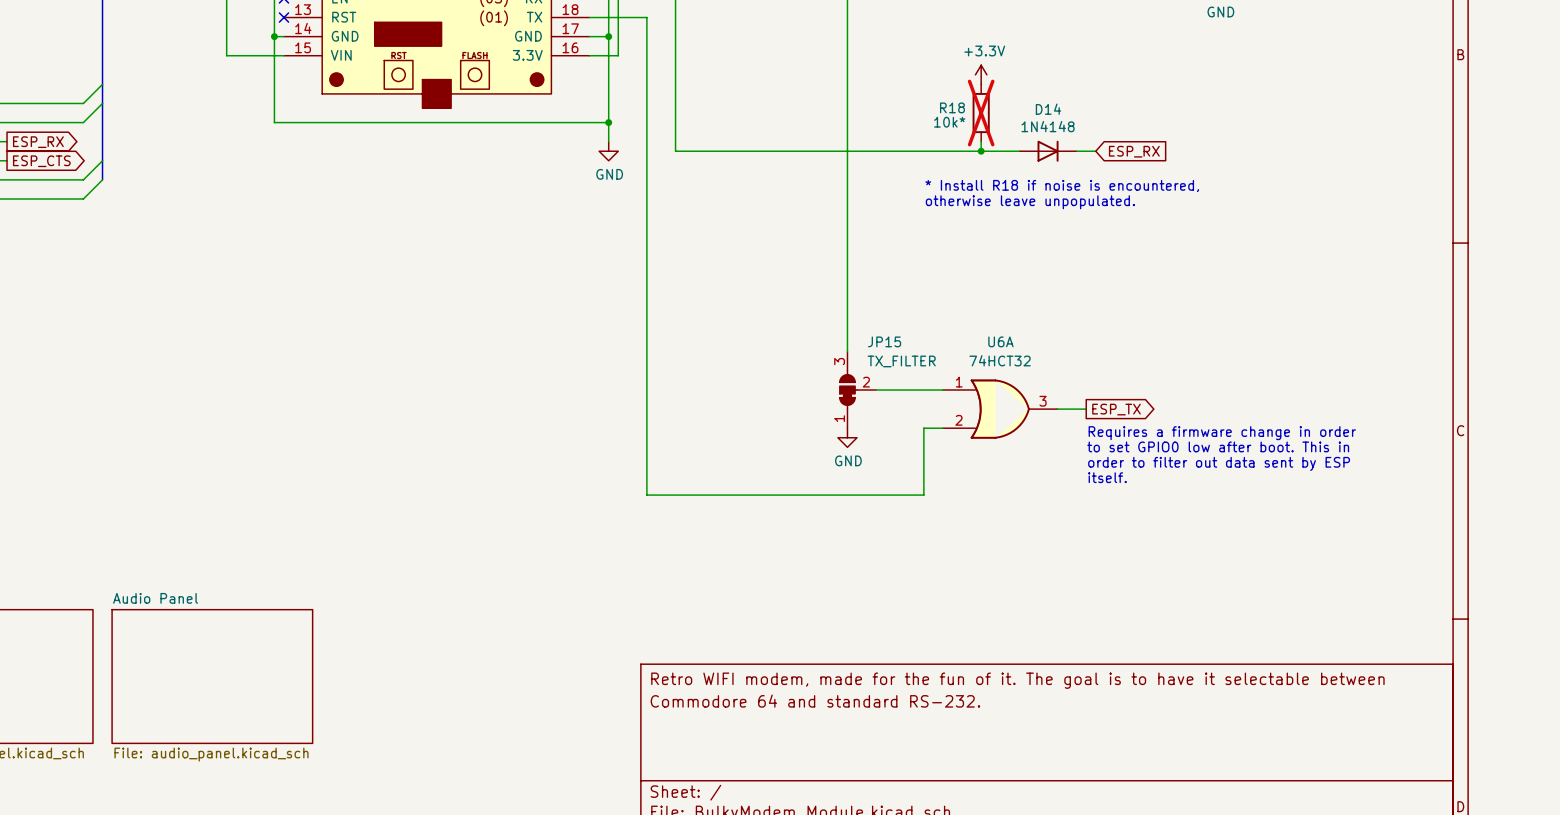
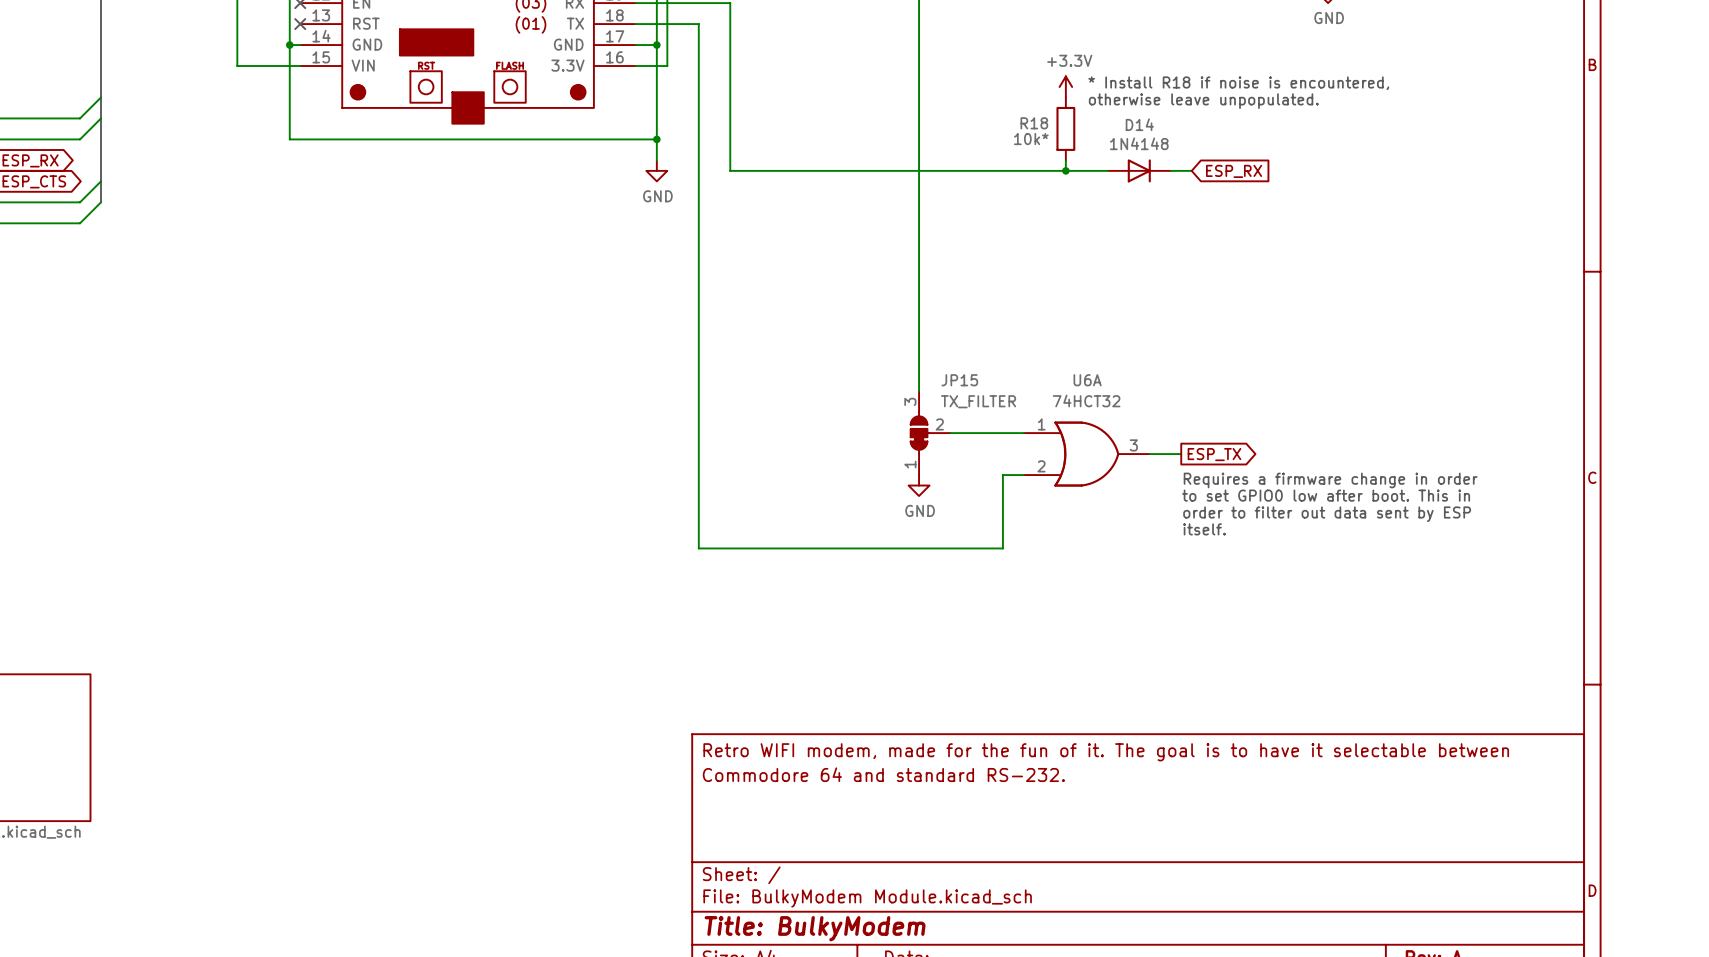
R18 do-not-place cross: (981, 113) -> none
text position: * Install R18 if noise is encountered, (1062, 186) -> * Install R18 if noise is encountered, (1238, 83)
text position: otherwise leave unpopulated. (1030, 202) -> otherwise leave unpopulated. (1203, 101)
sheet Audio Panel: File: audio_panel.kicad_sch (212, 676) -> none

